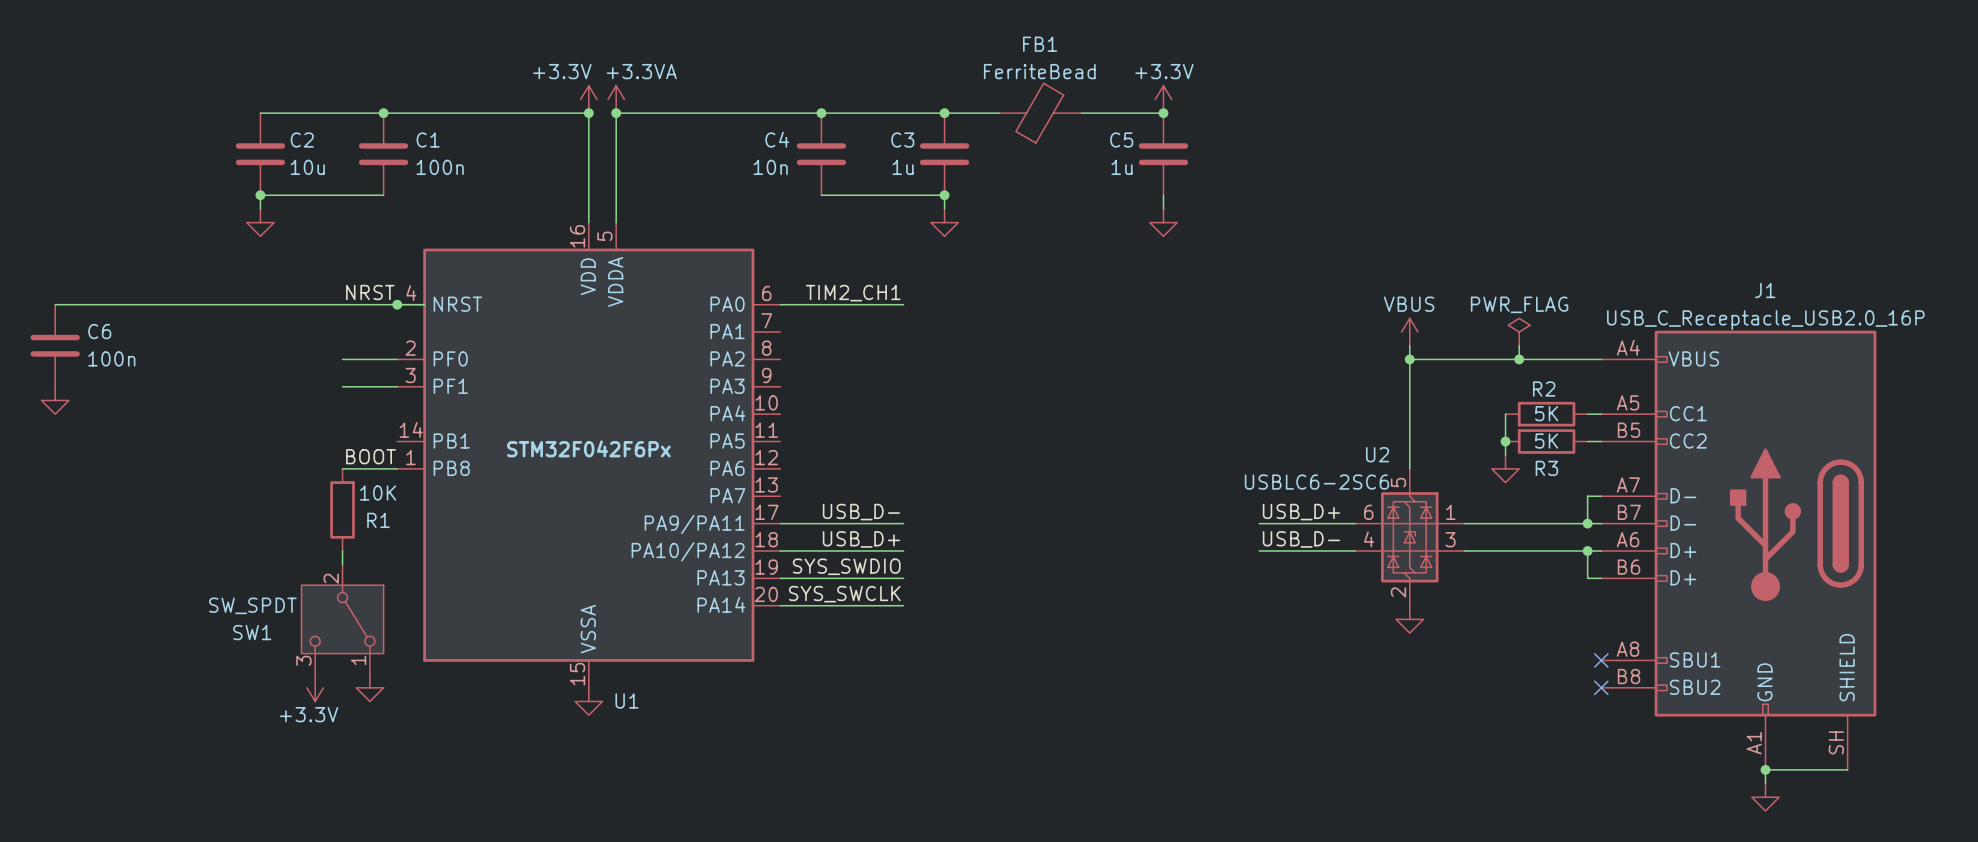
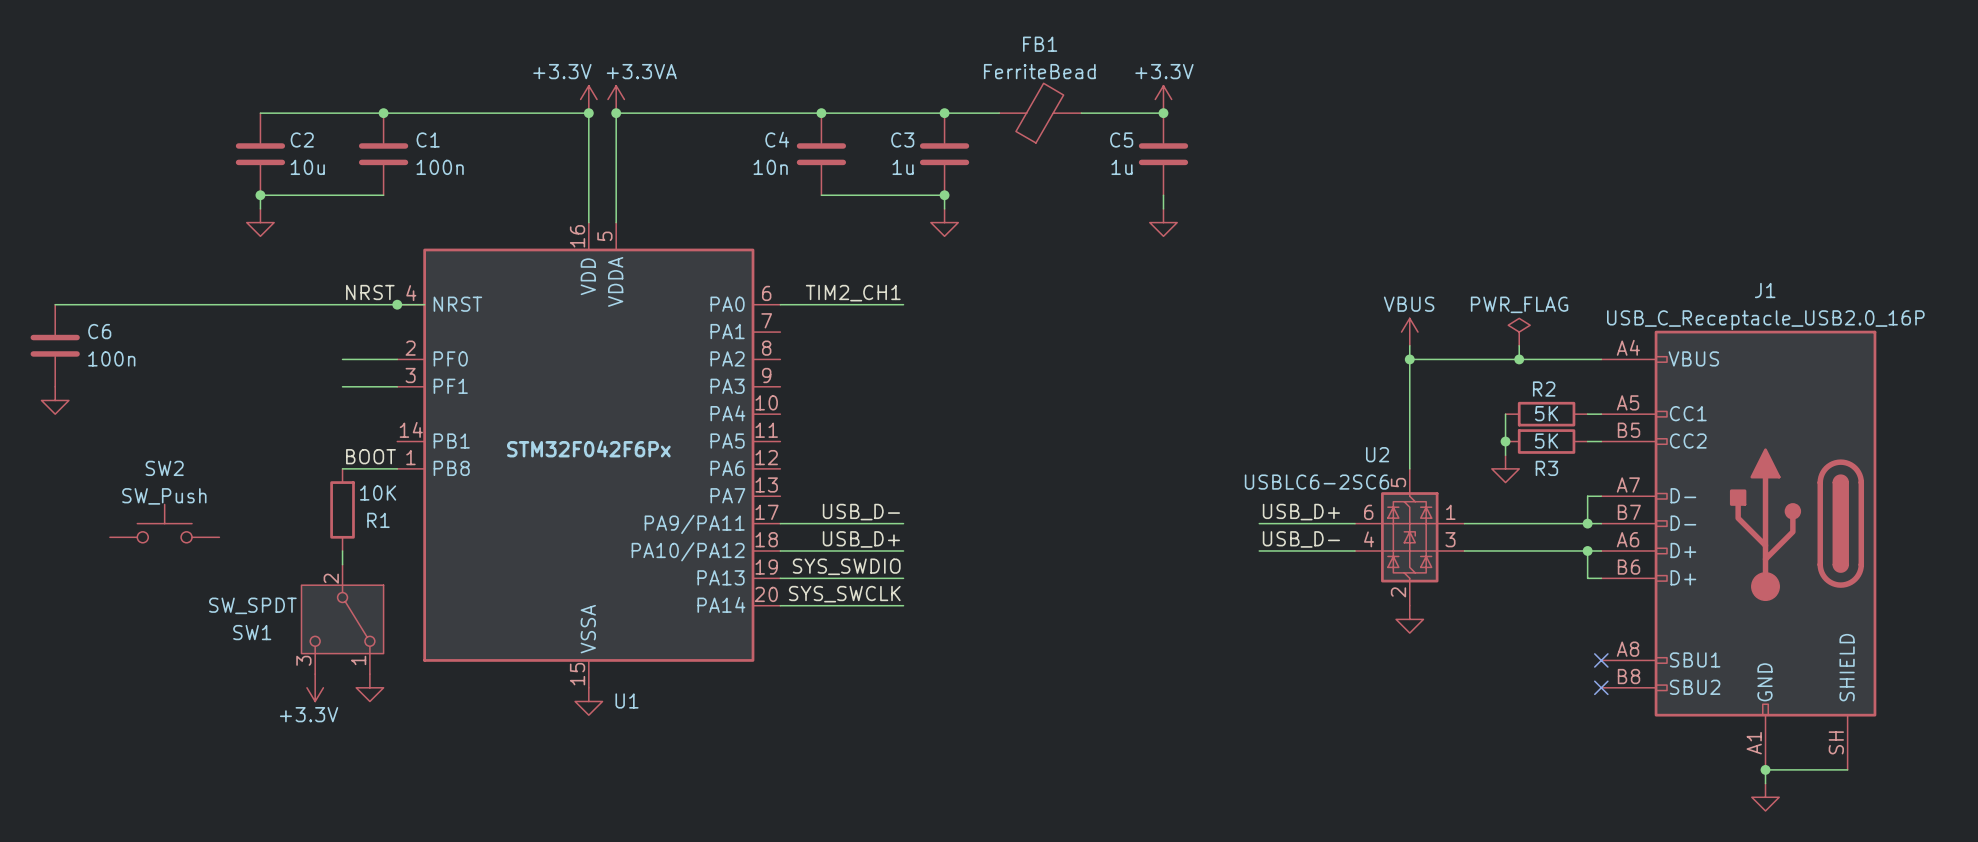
SW2: none -> SW_Push (164, 523)

